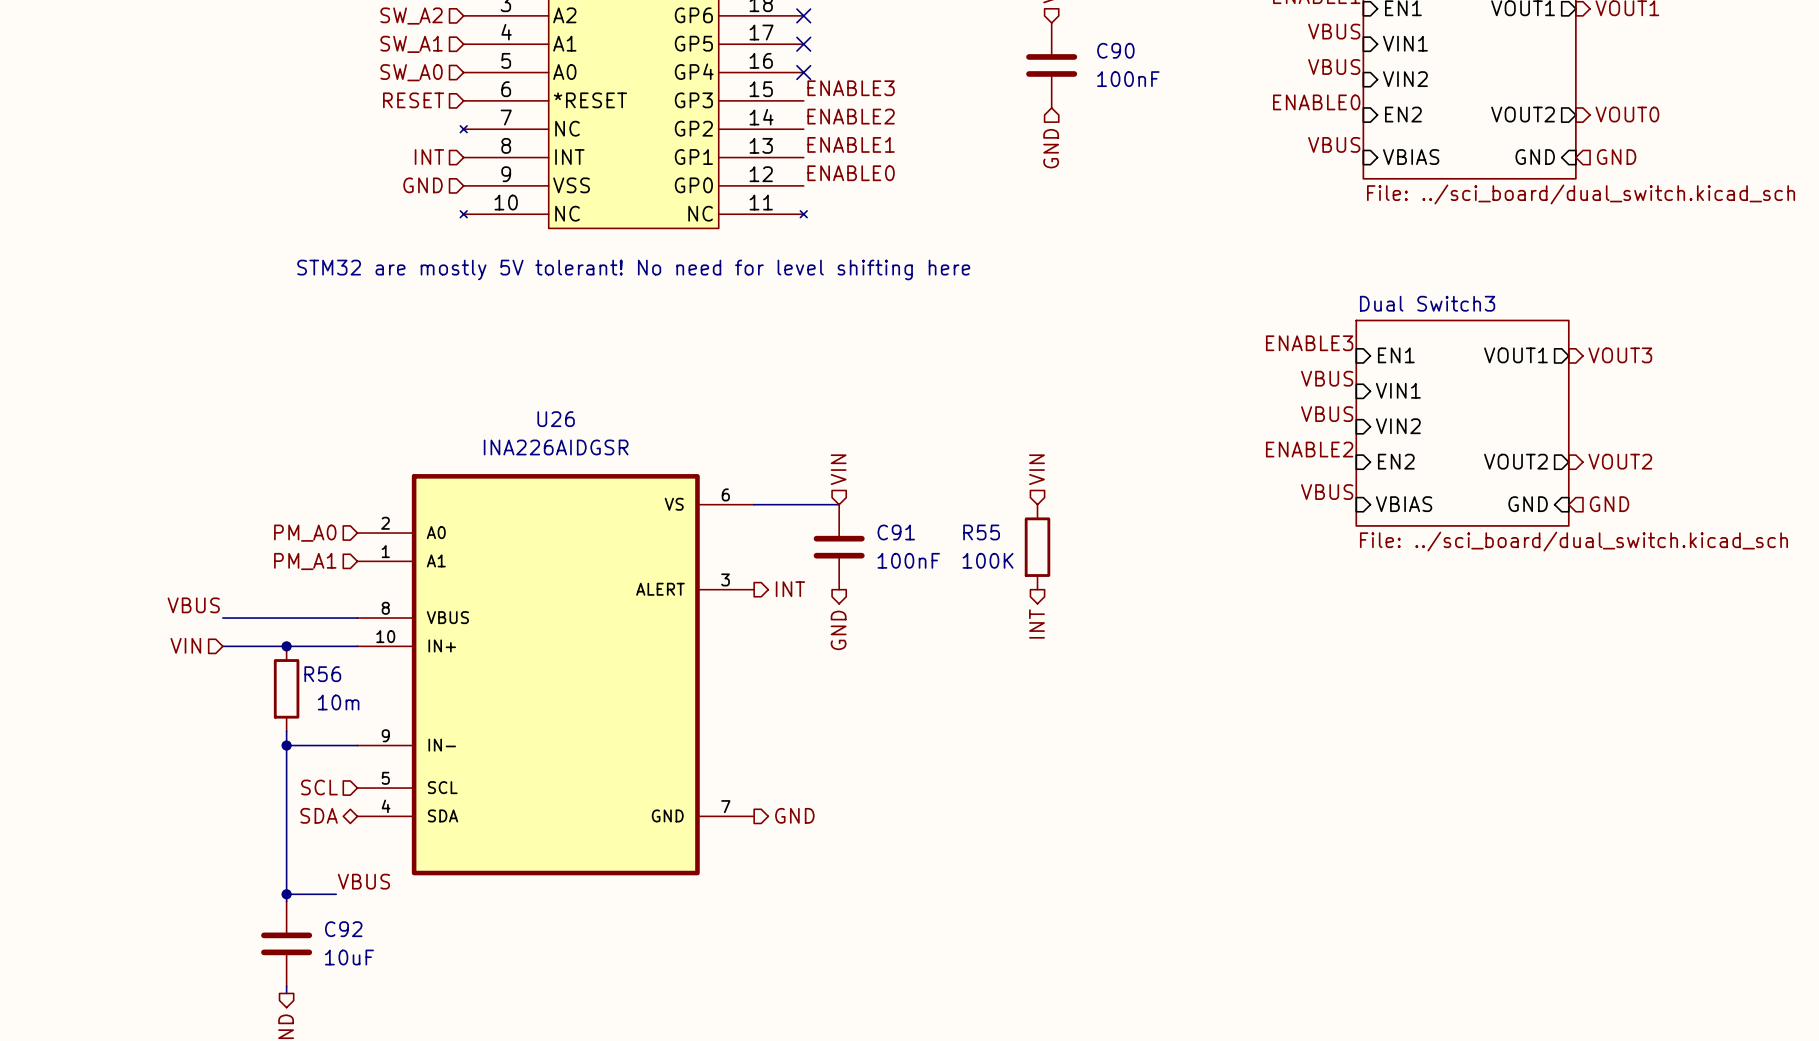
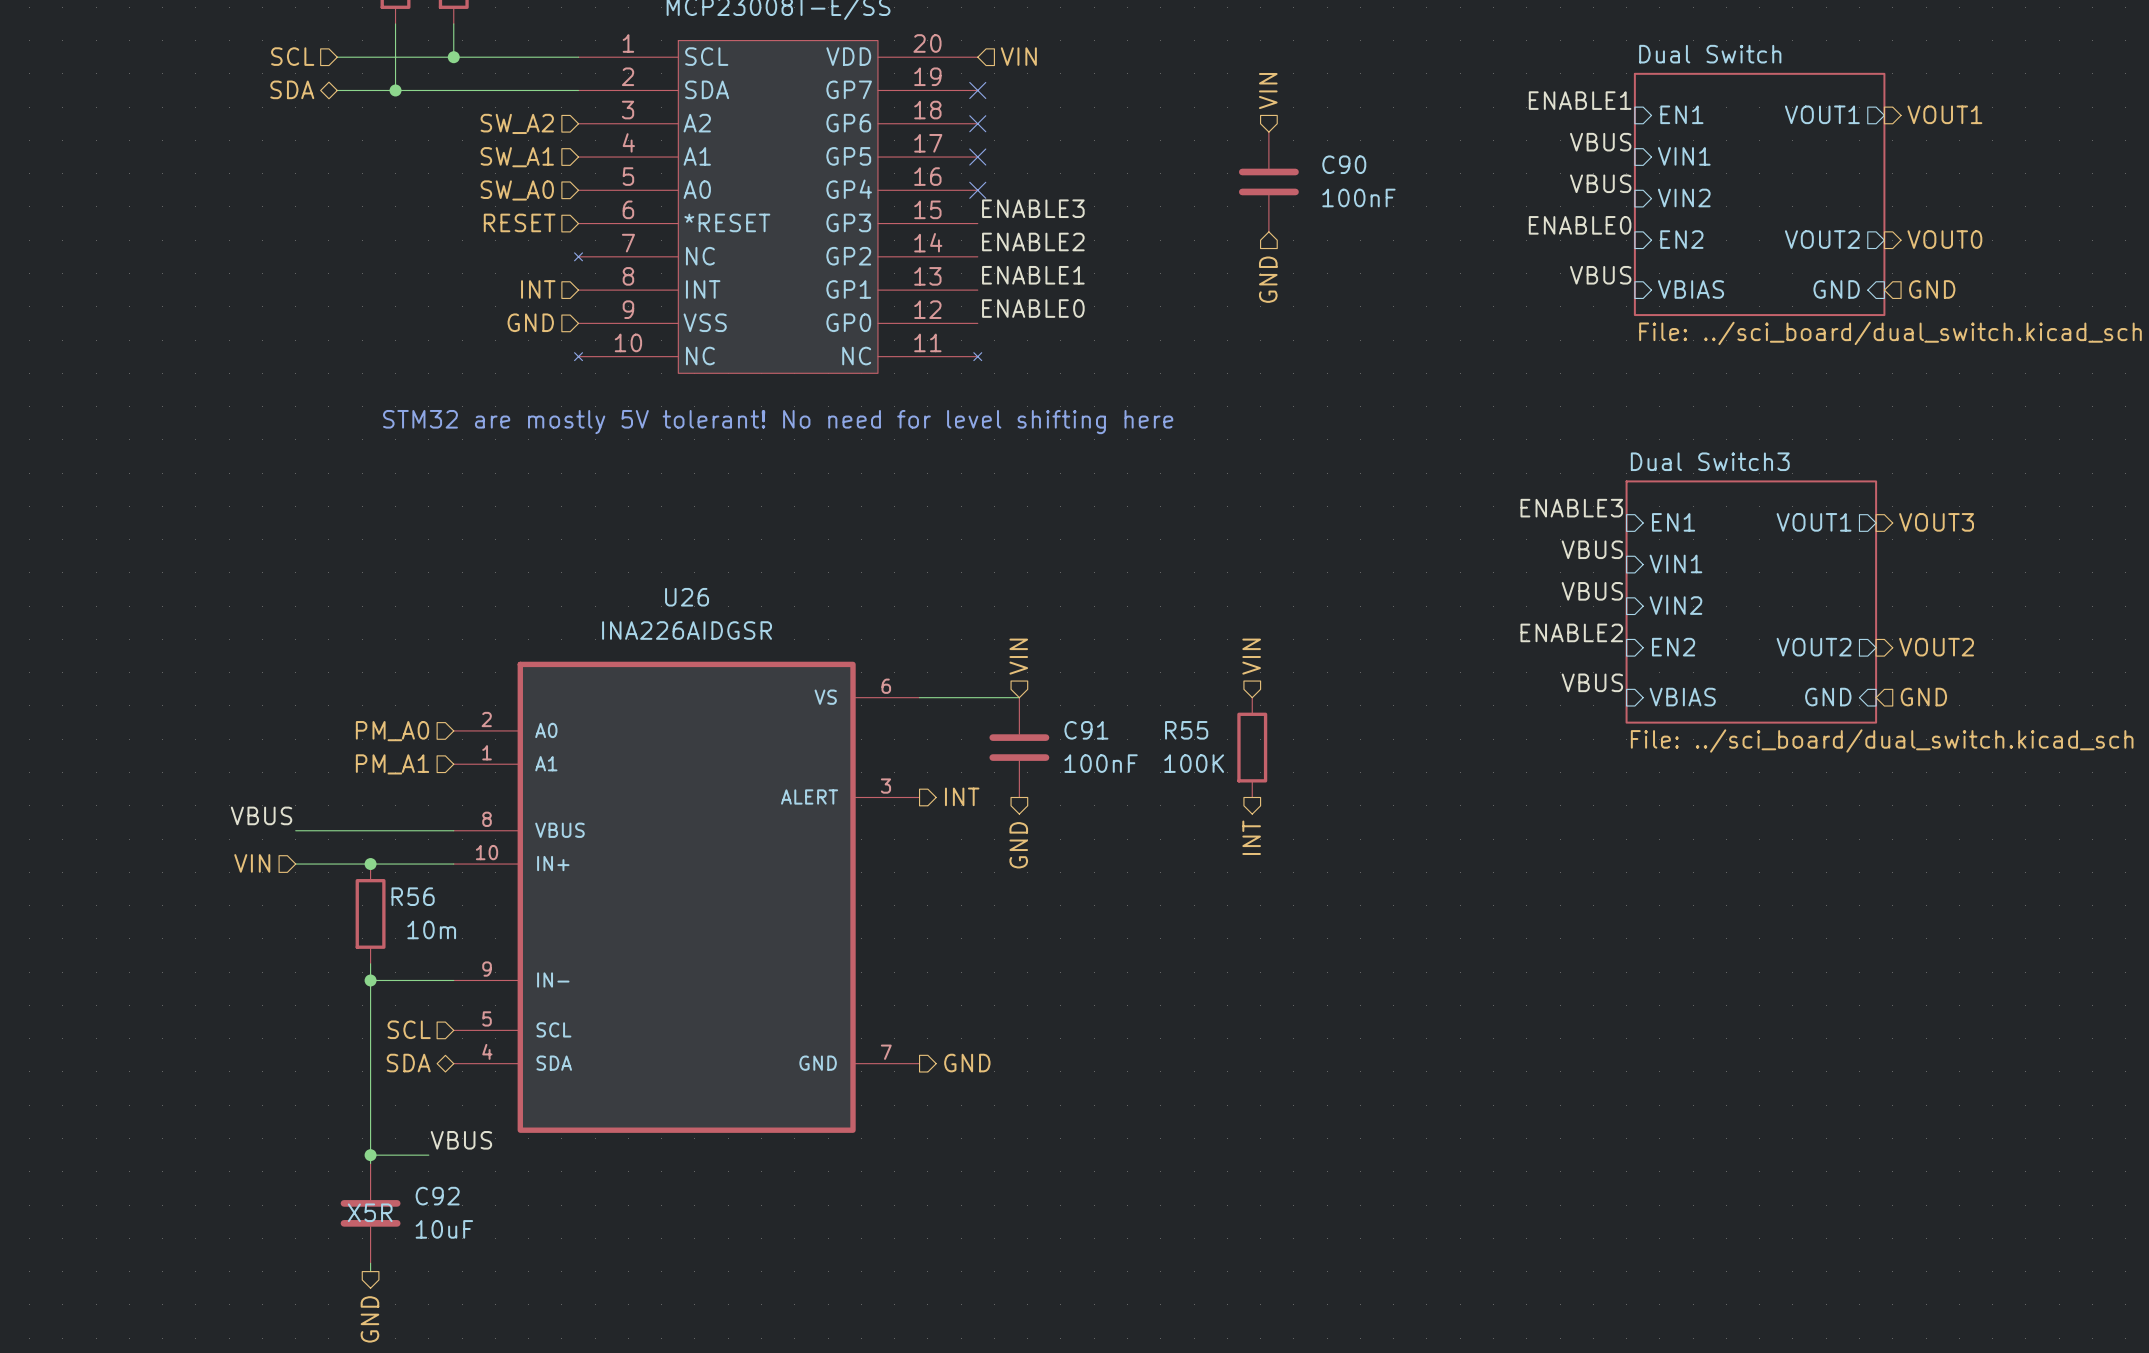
C92 text: none -> X5R (370, 1212)

